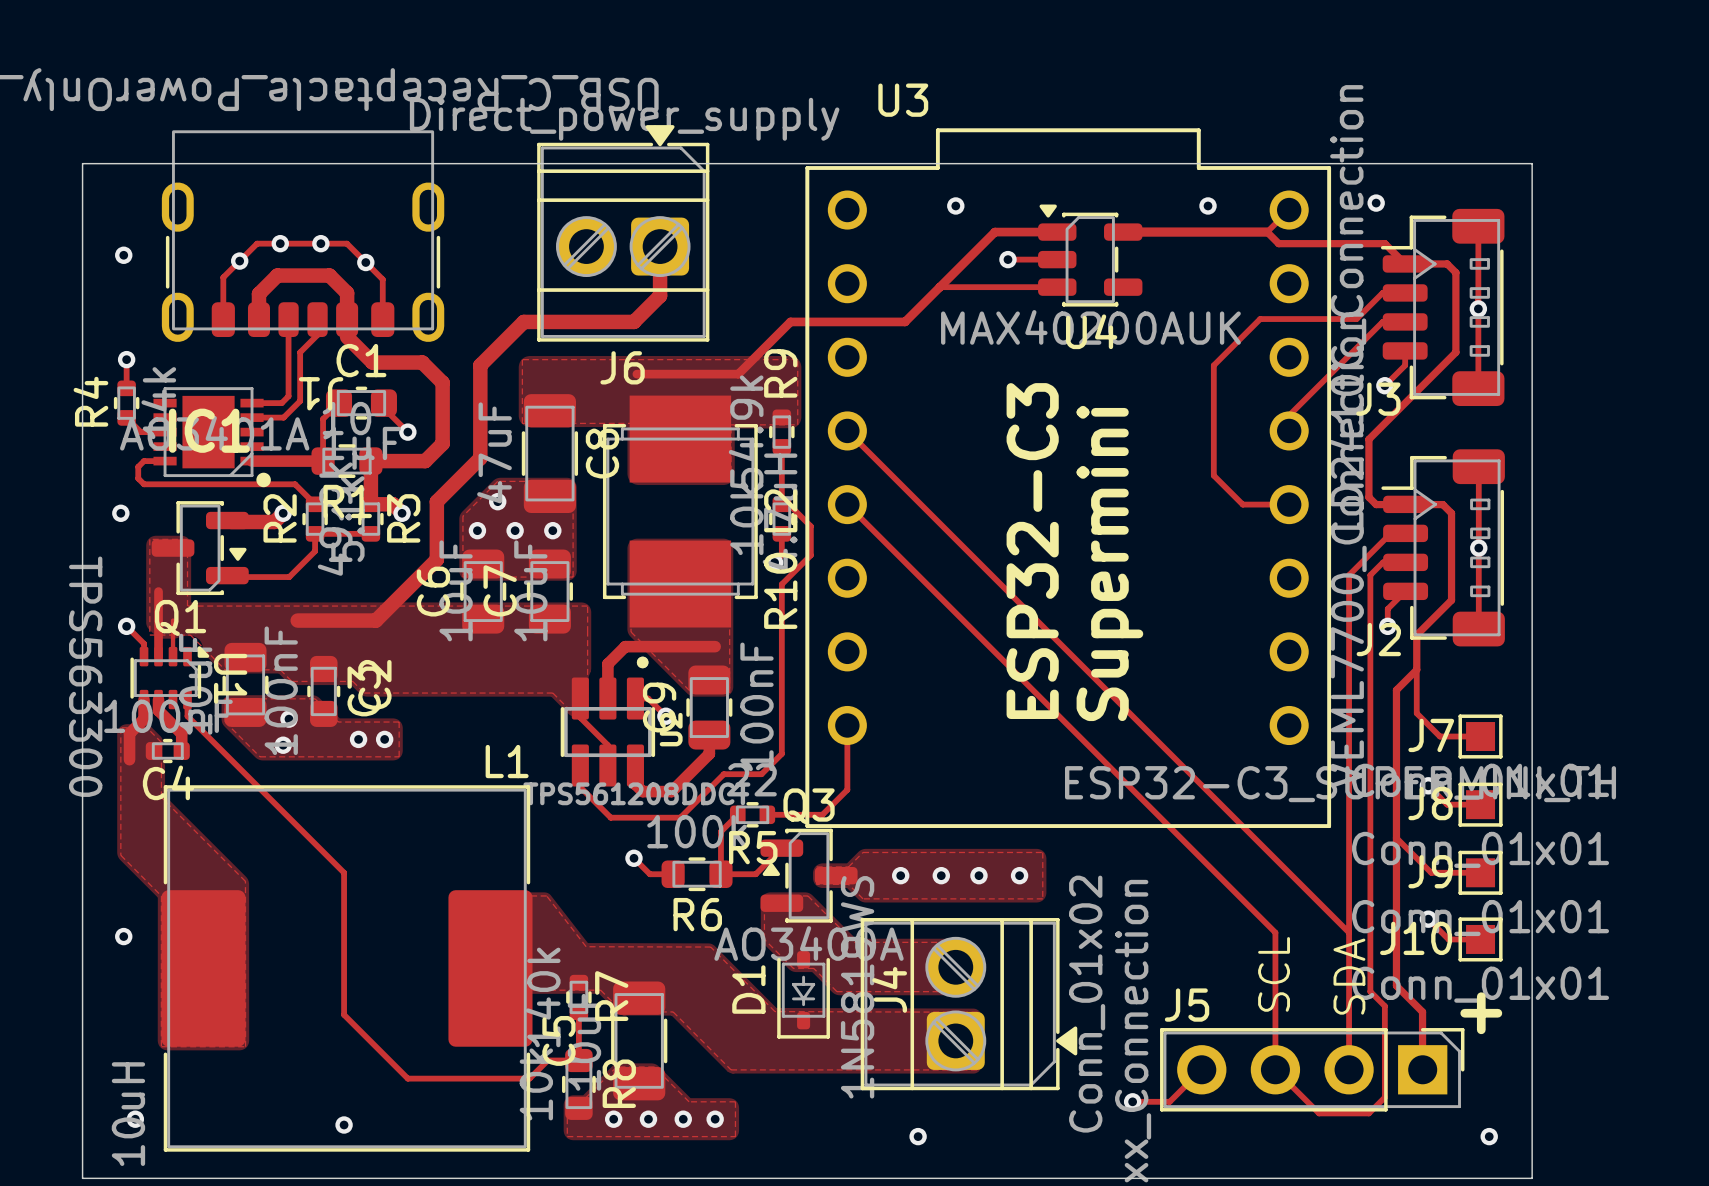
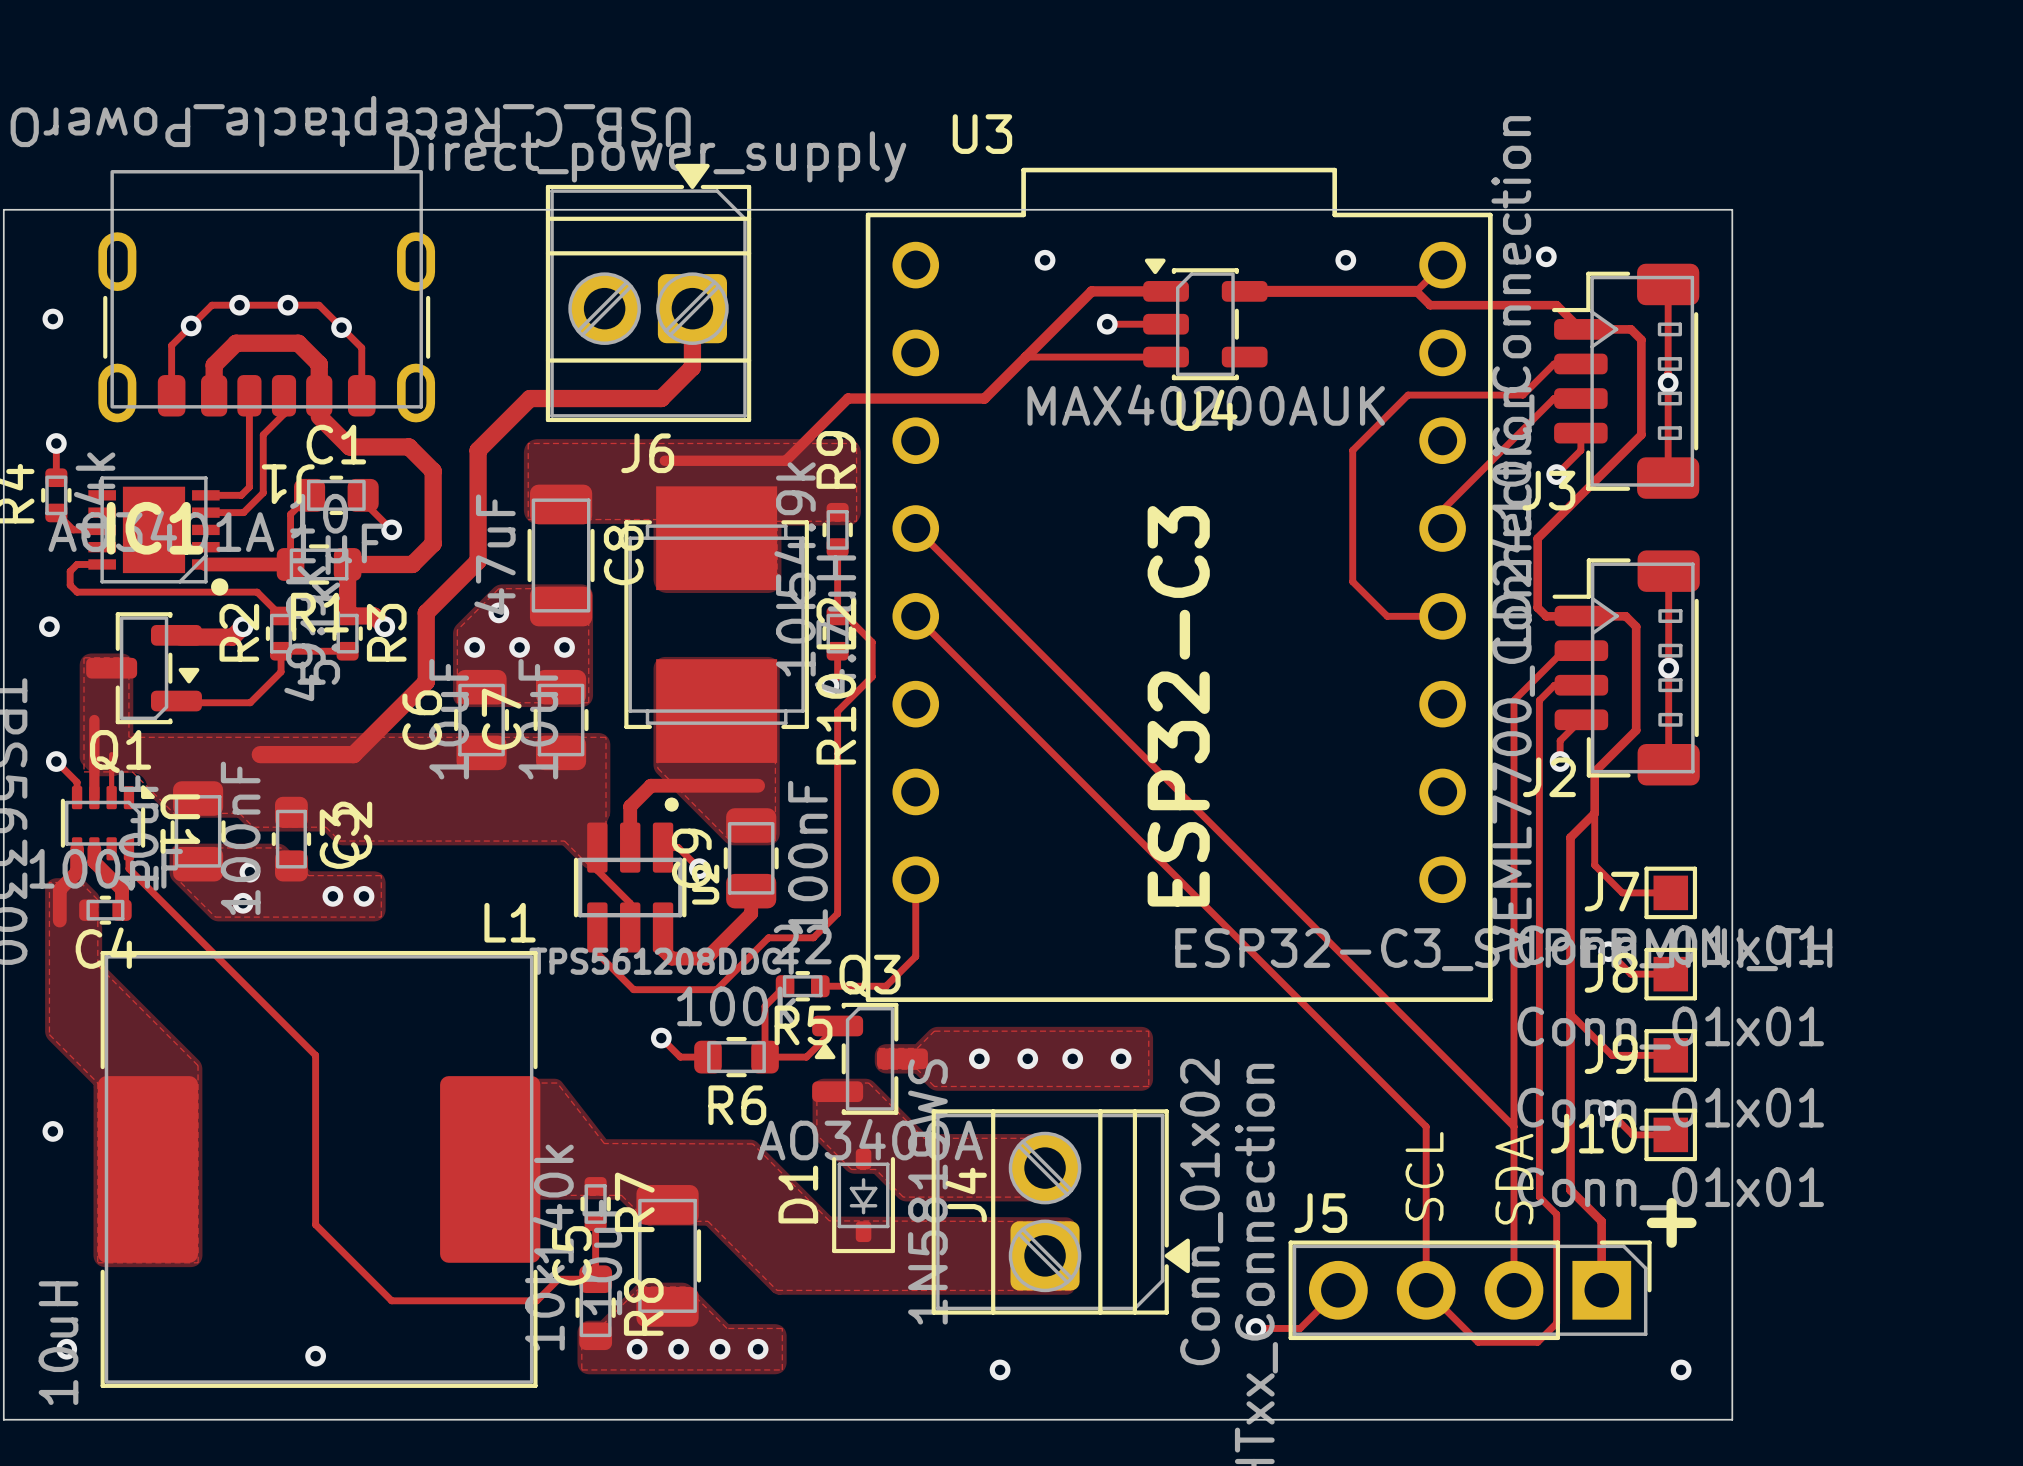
text position: ESP32-C3 (1032, 551) -> ESP32-C3 (1178, 706)
text: Supermini (1109, 563) -> none

